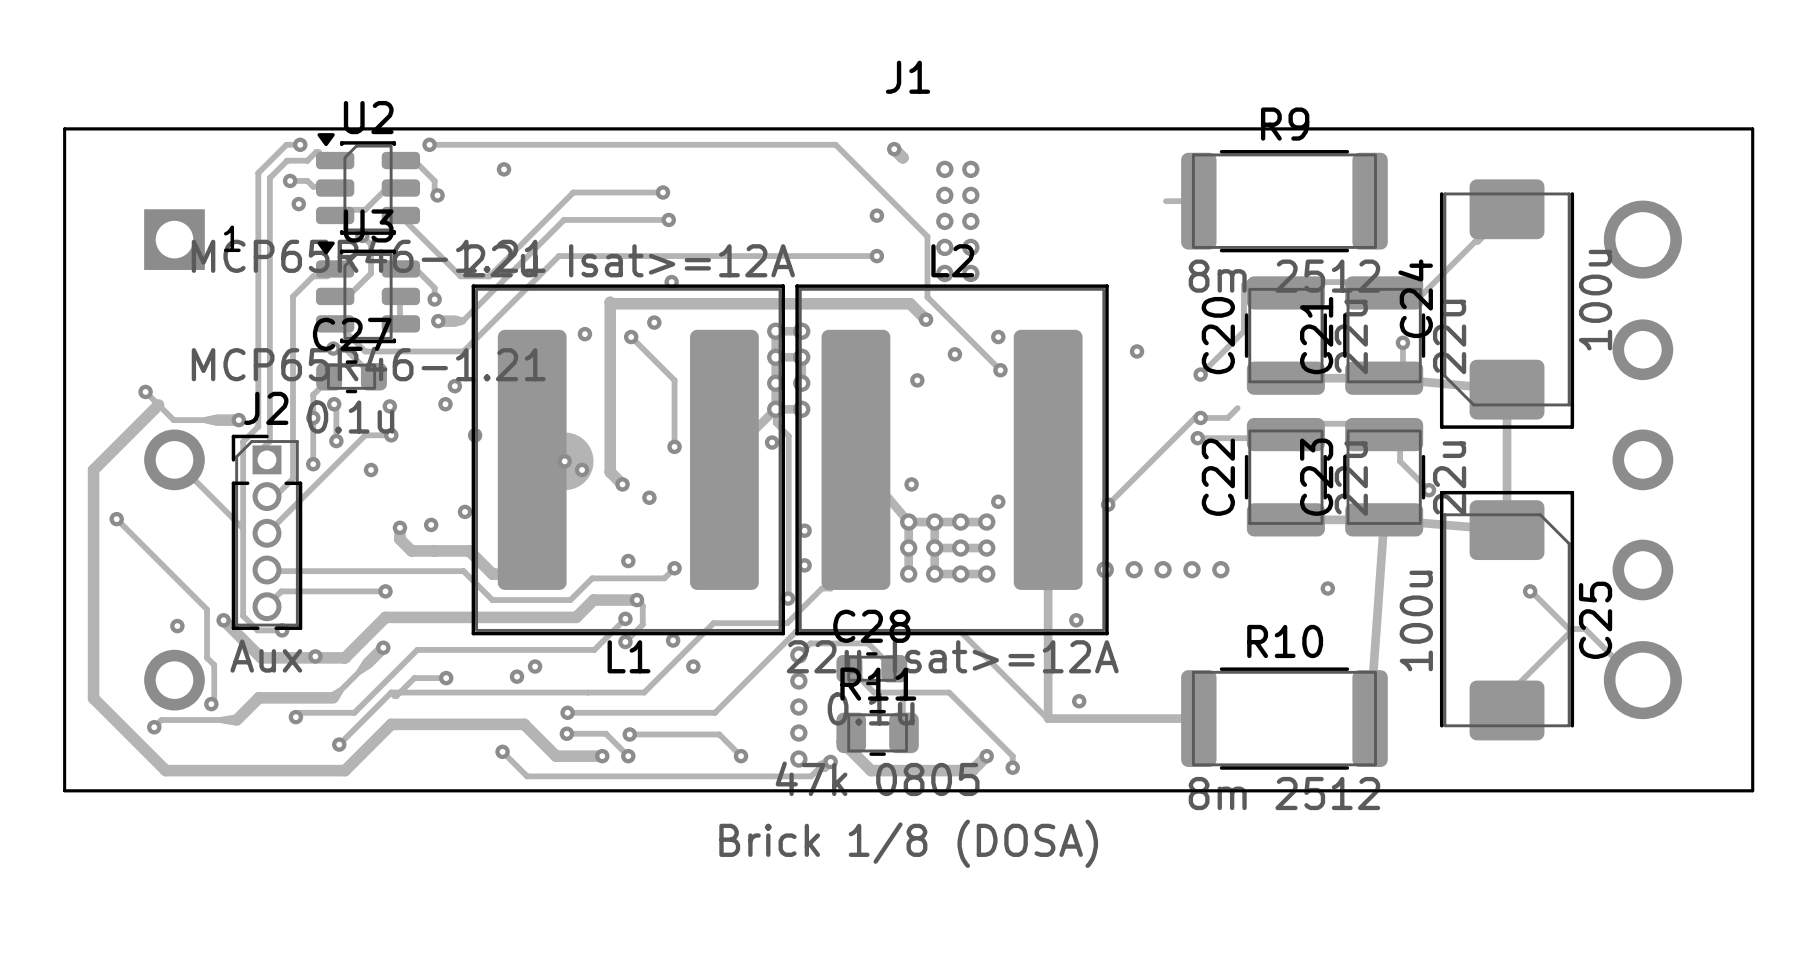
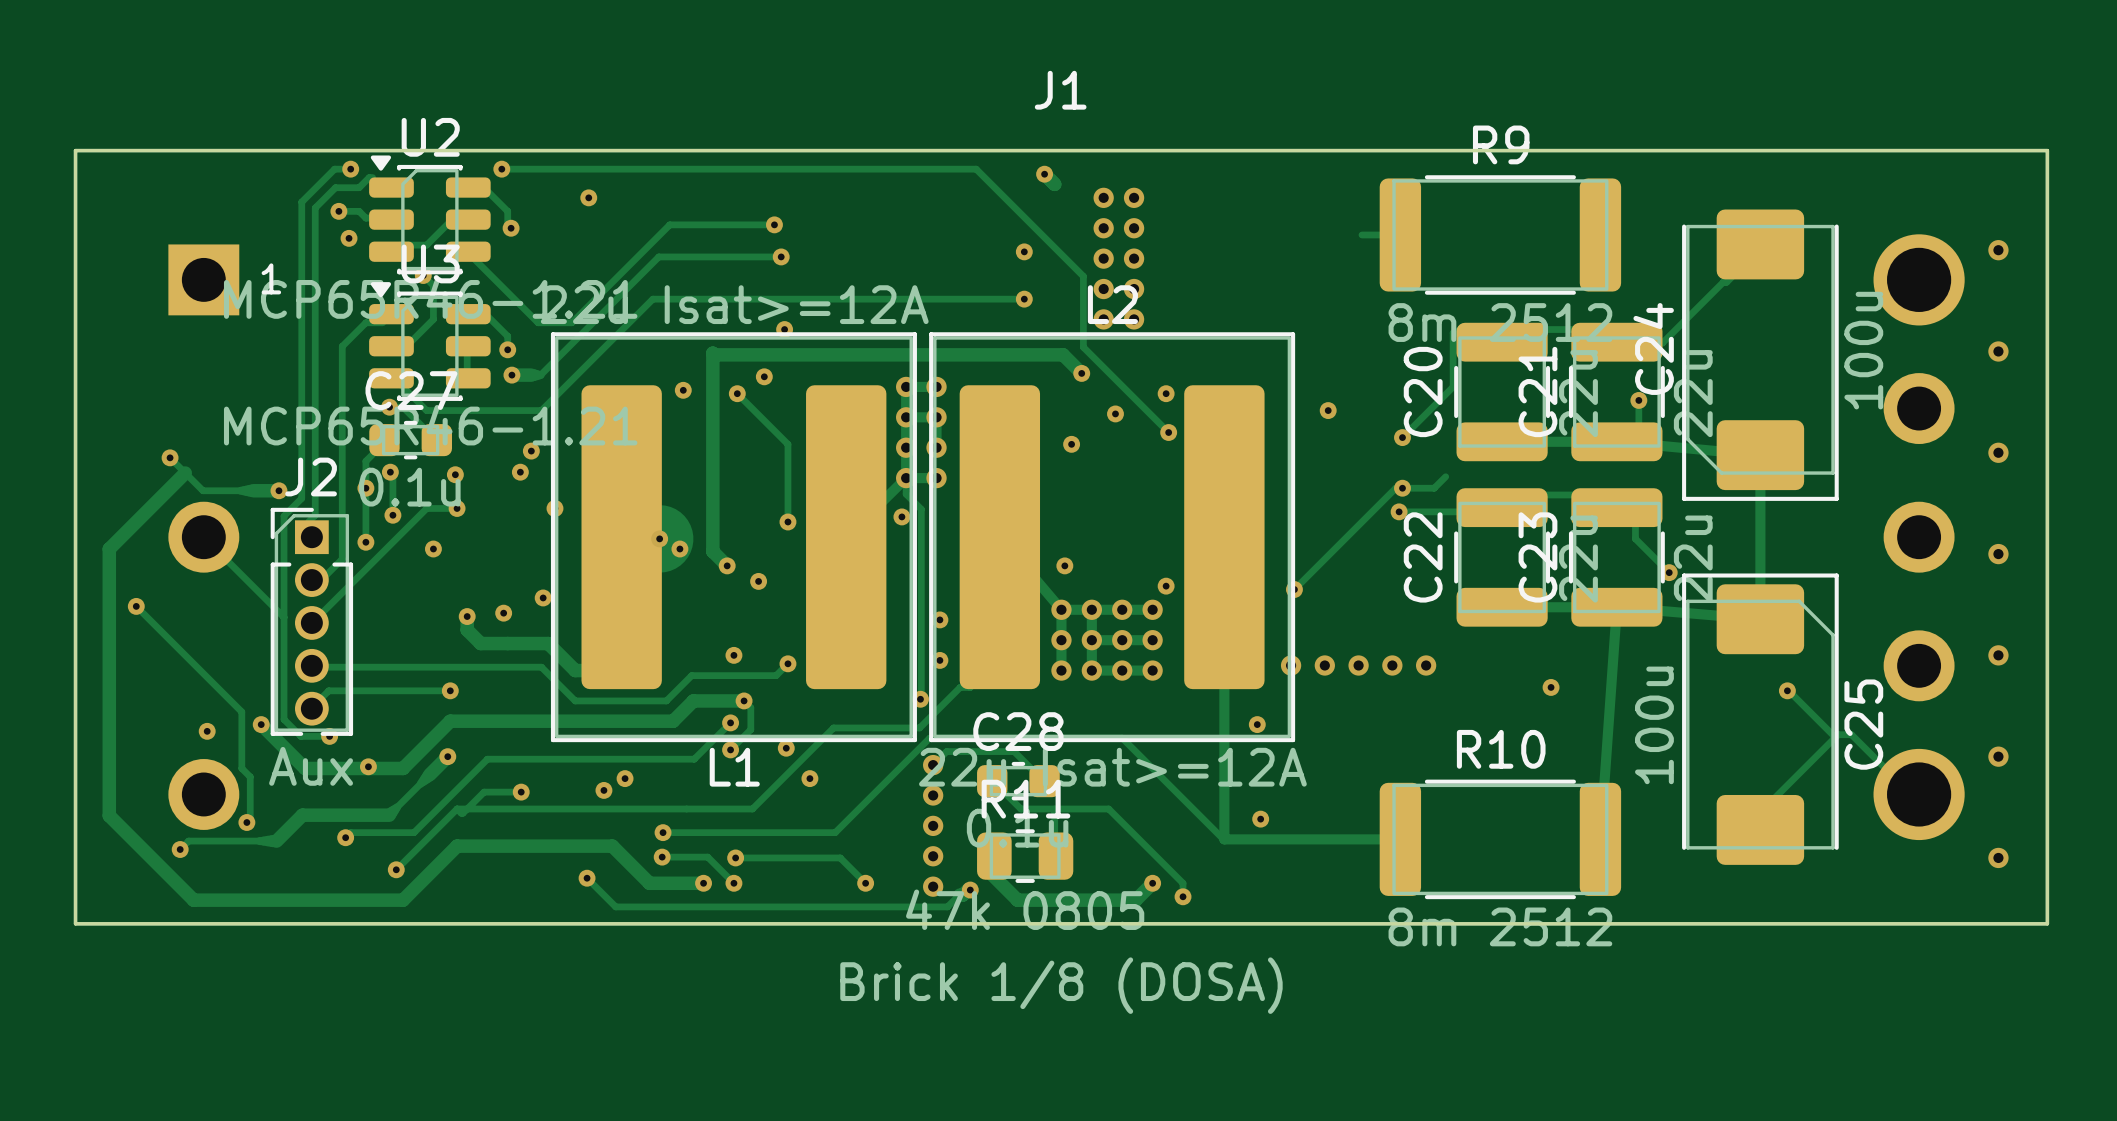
via: none -> (1998, 250)
via: none -> (1998, 351)
via: none -> (1998, 452)
via: none -> (1998, 554)
via: none -> (1998, 655)
via: none -> (1998, 756)
via: none -> (1998, 857)

